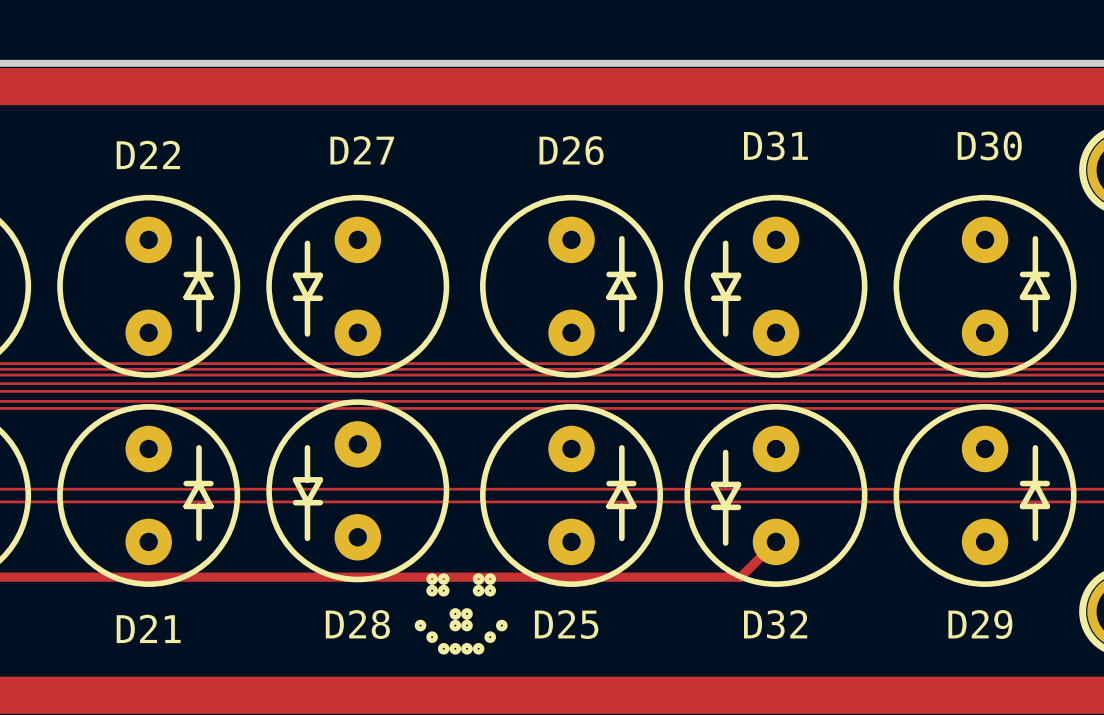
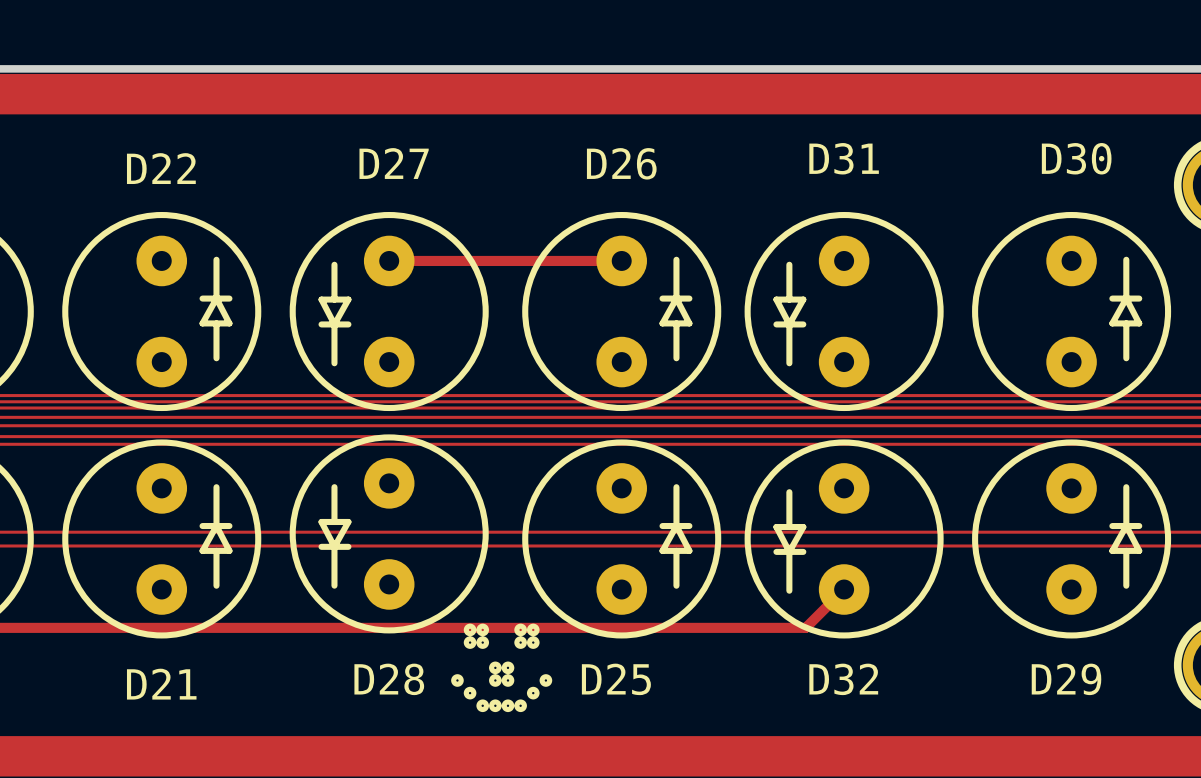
track: none -> (389, 260) (621, 260)

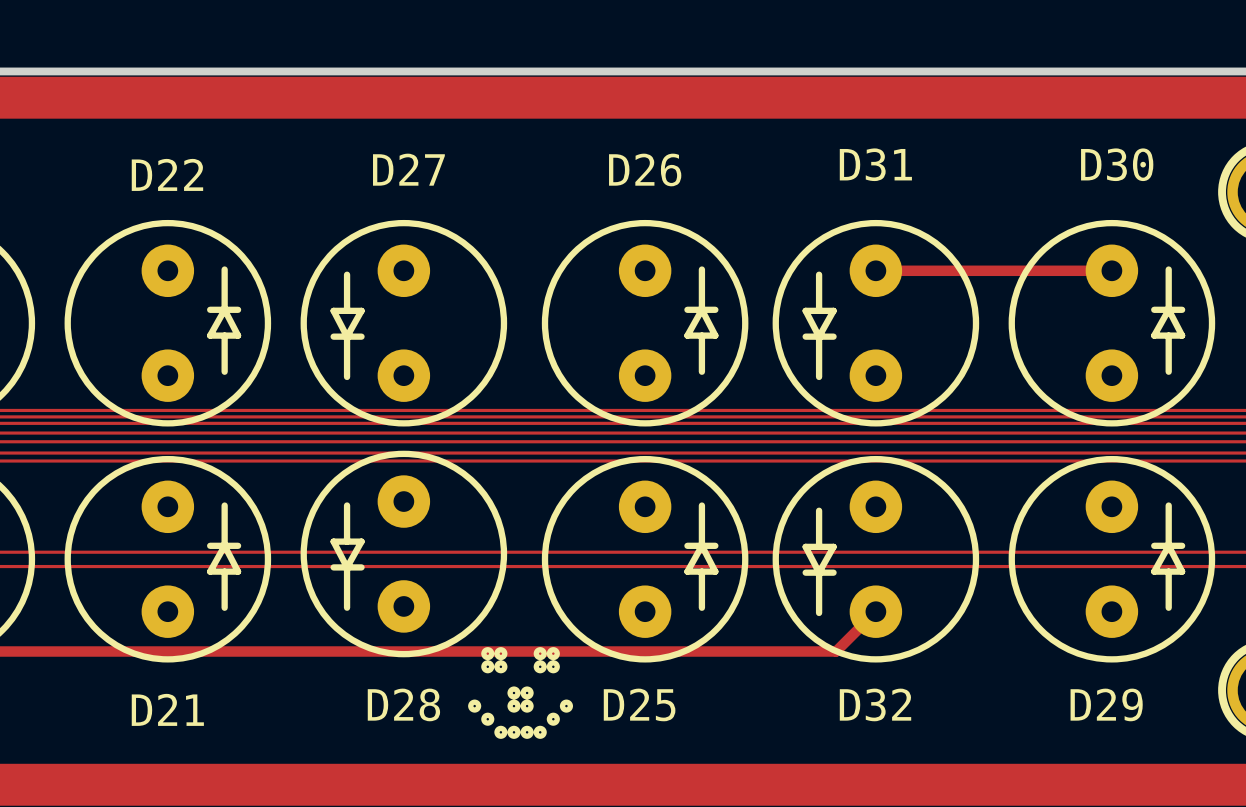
track: (389, 260) (621, 260) -> none
track: none -> (875, 270) (1111, 270)

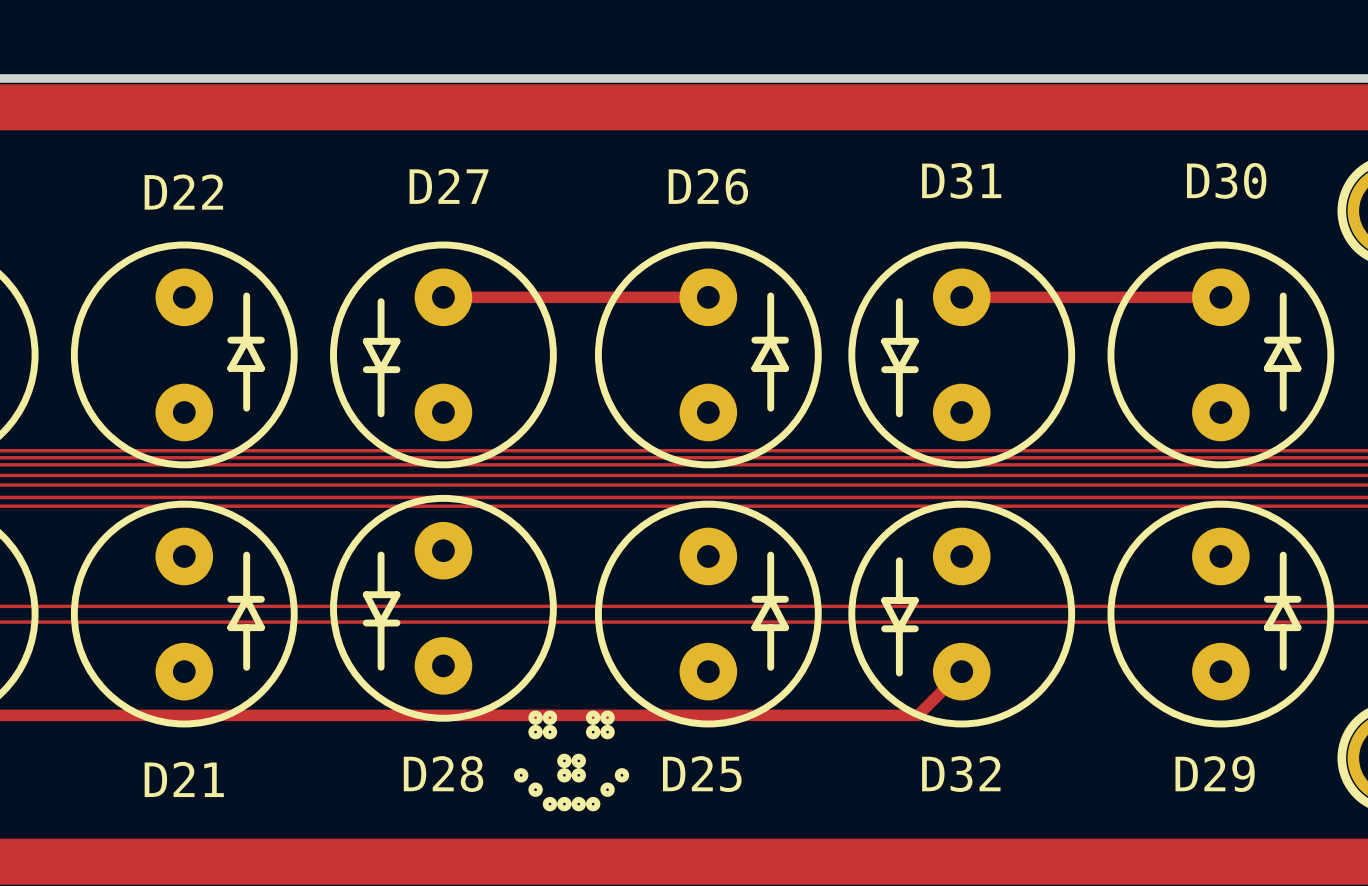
track: none -> (443, 297) (708, 297)

